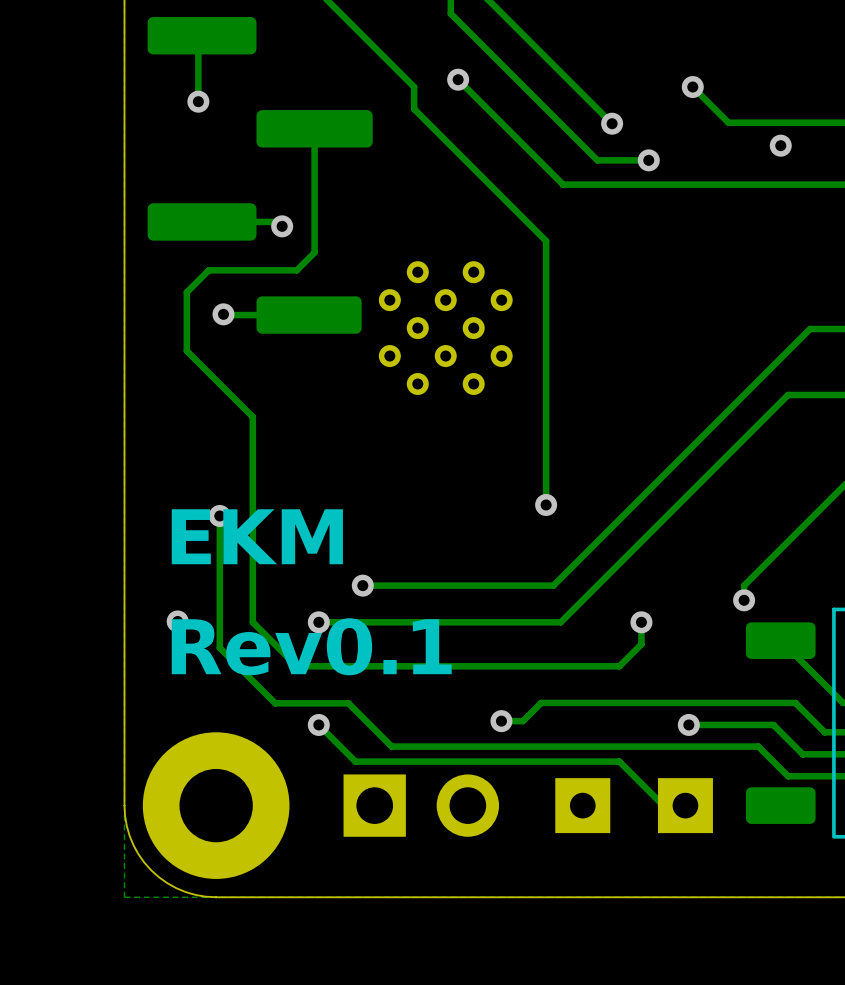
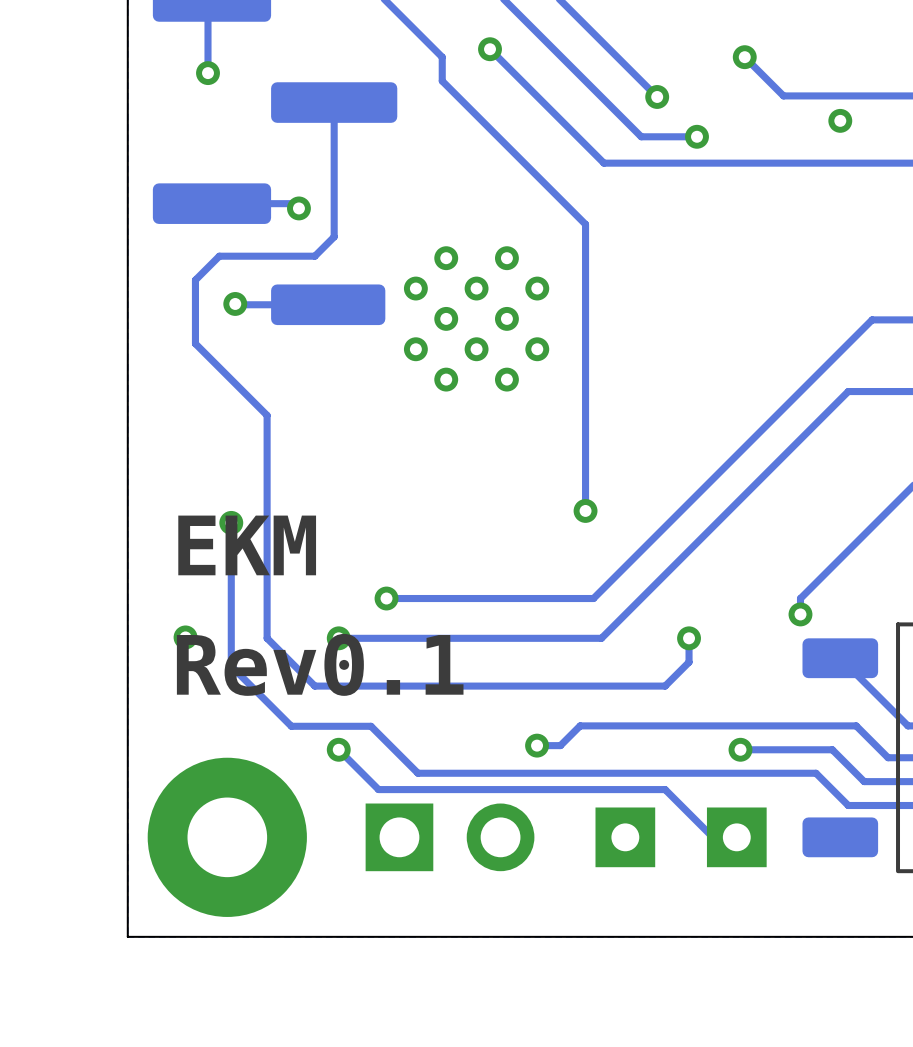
board edge: (124, 805) (129, 835) (138, 854) (151, 870) (167, 883) (185, 892) (216, 897) -> (127, 837) (127, 936) (227, 936)

